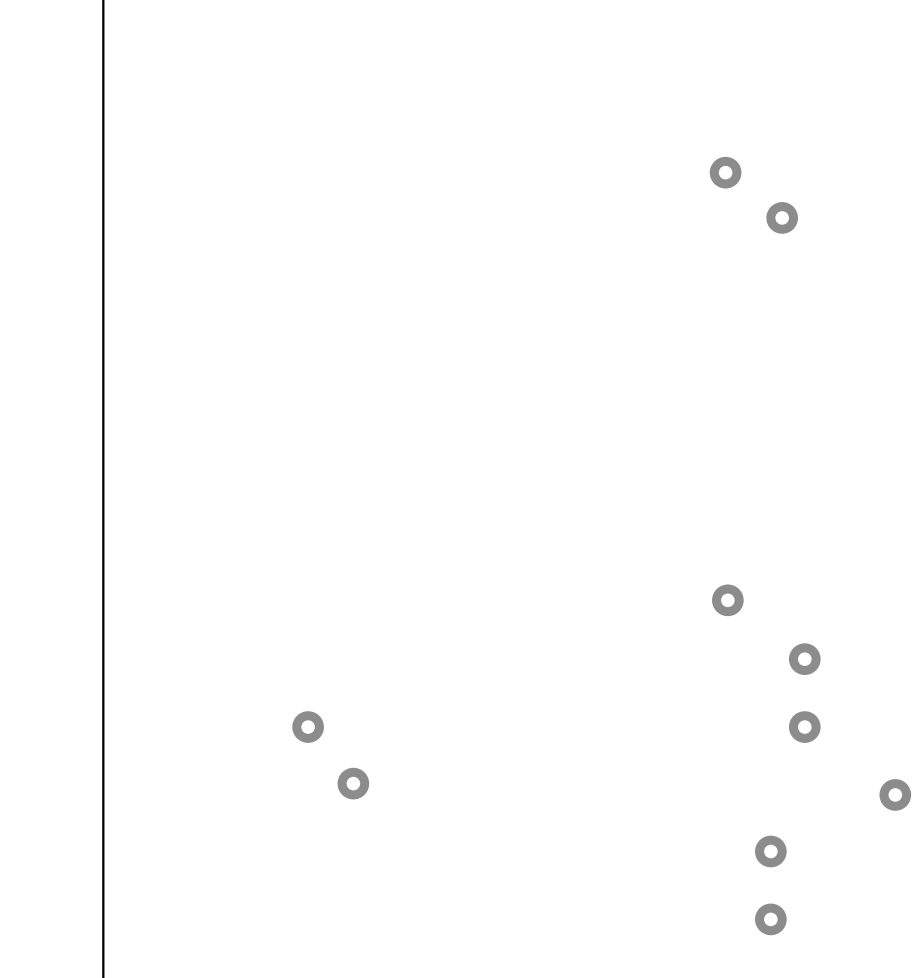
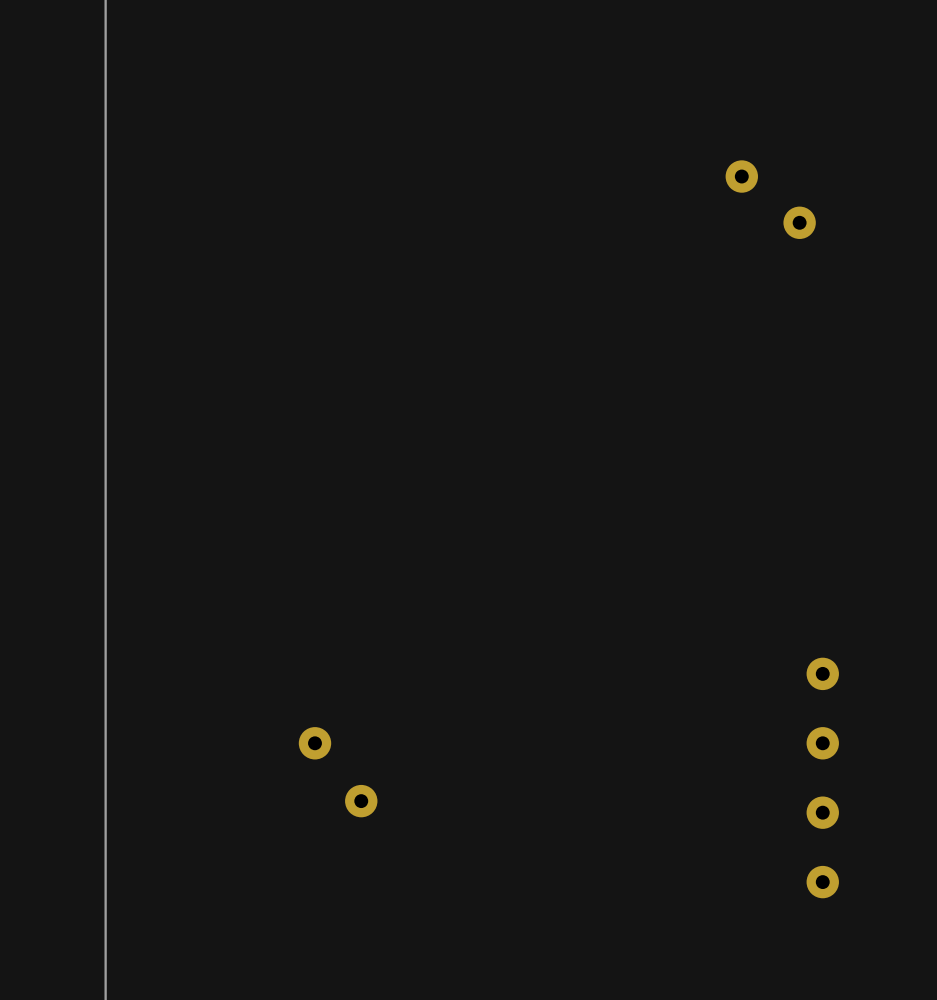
via: (727, 600) -> none
via: none -> (822, 812)
via: (895, 794) -> none
via: (770, 851) -> none
via: none -> (822, 882)
via: (770, 919) -> none

